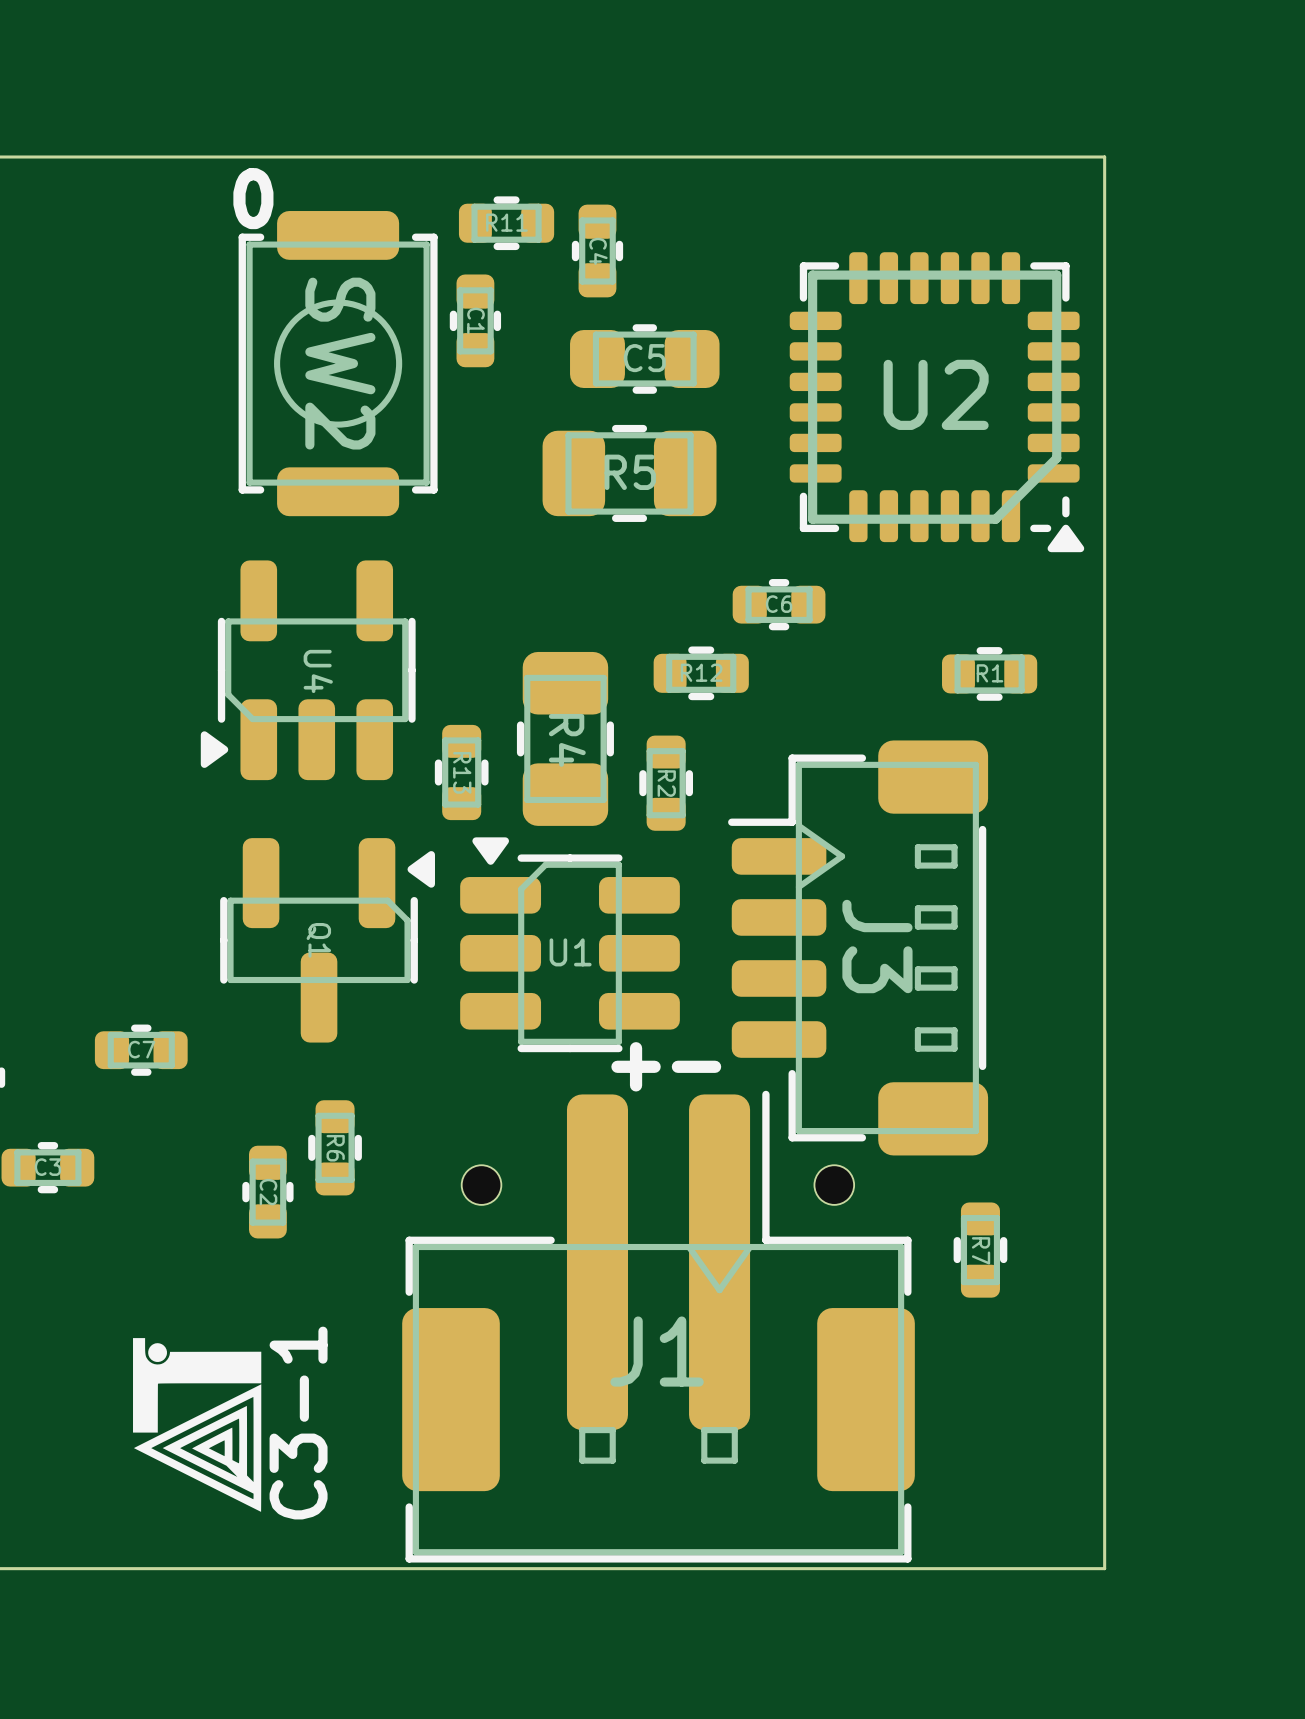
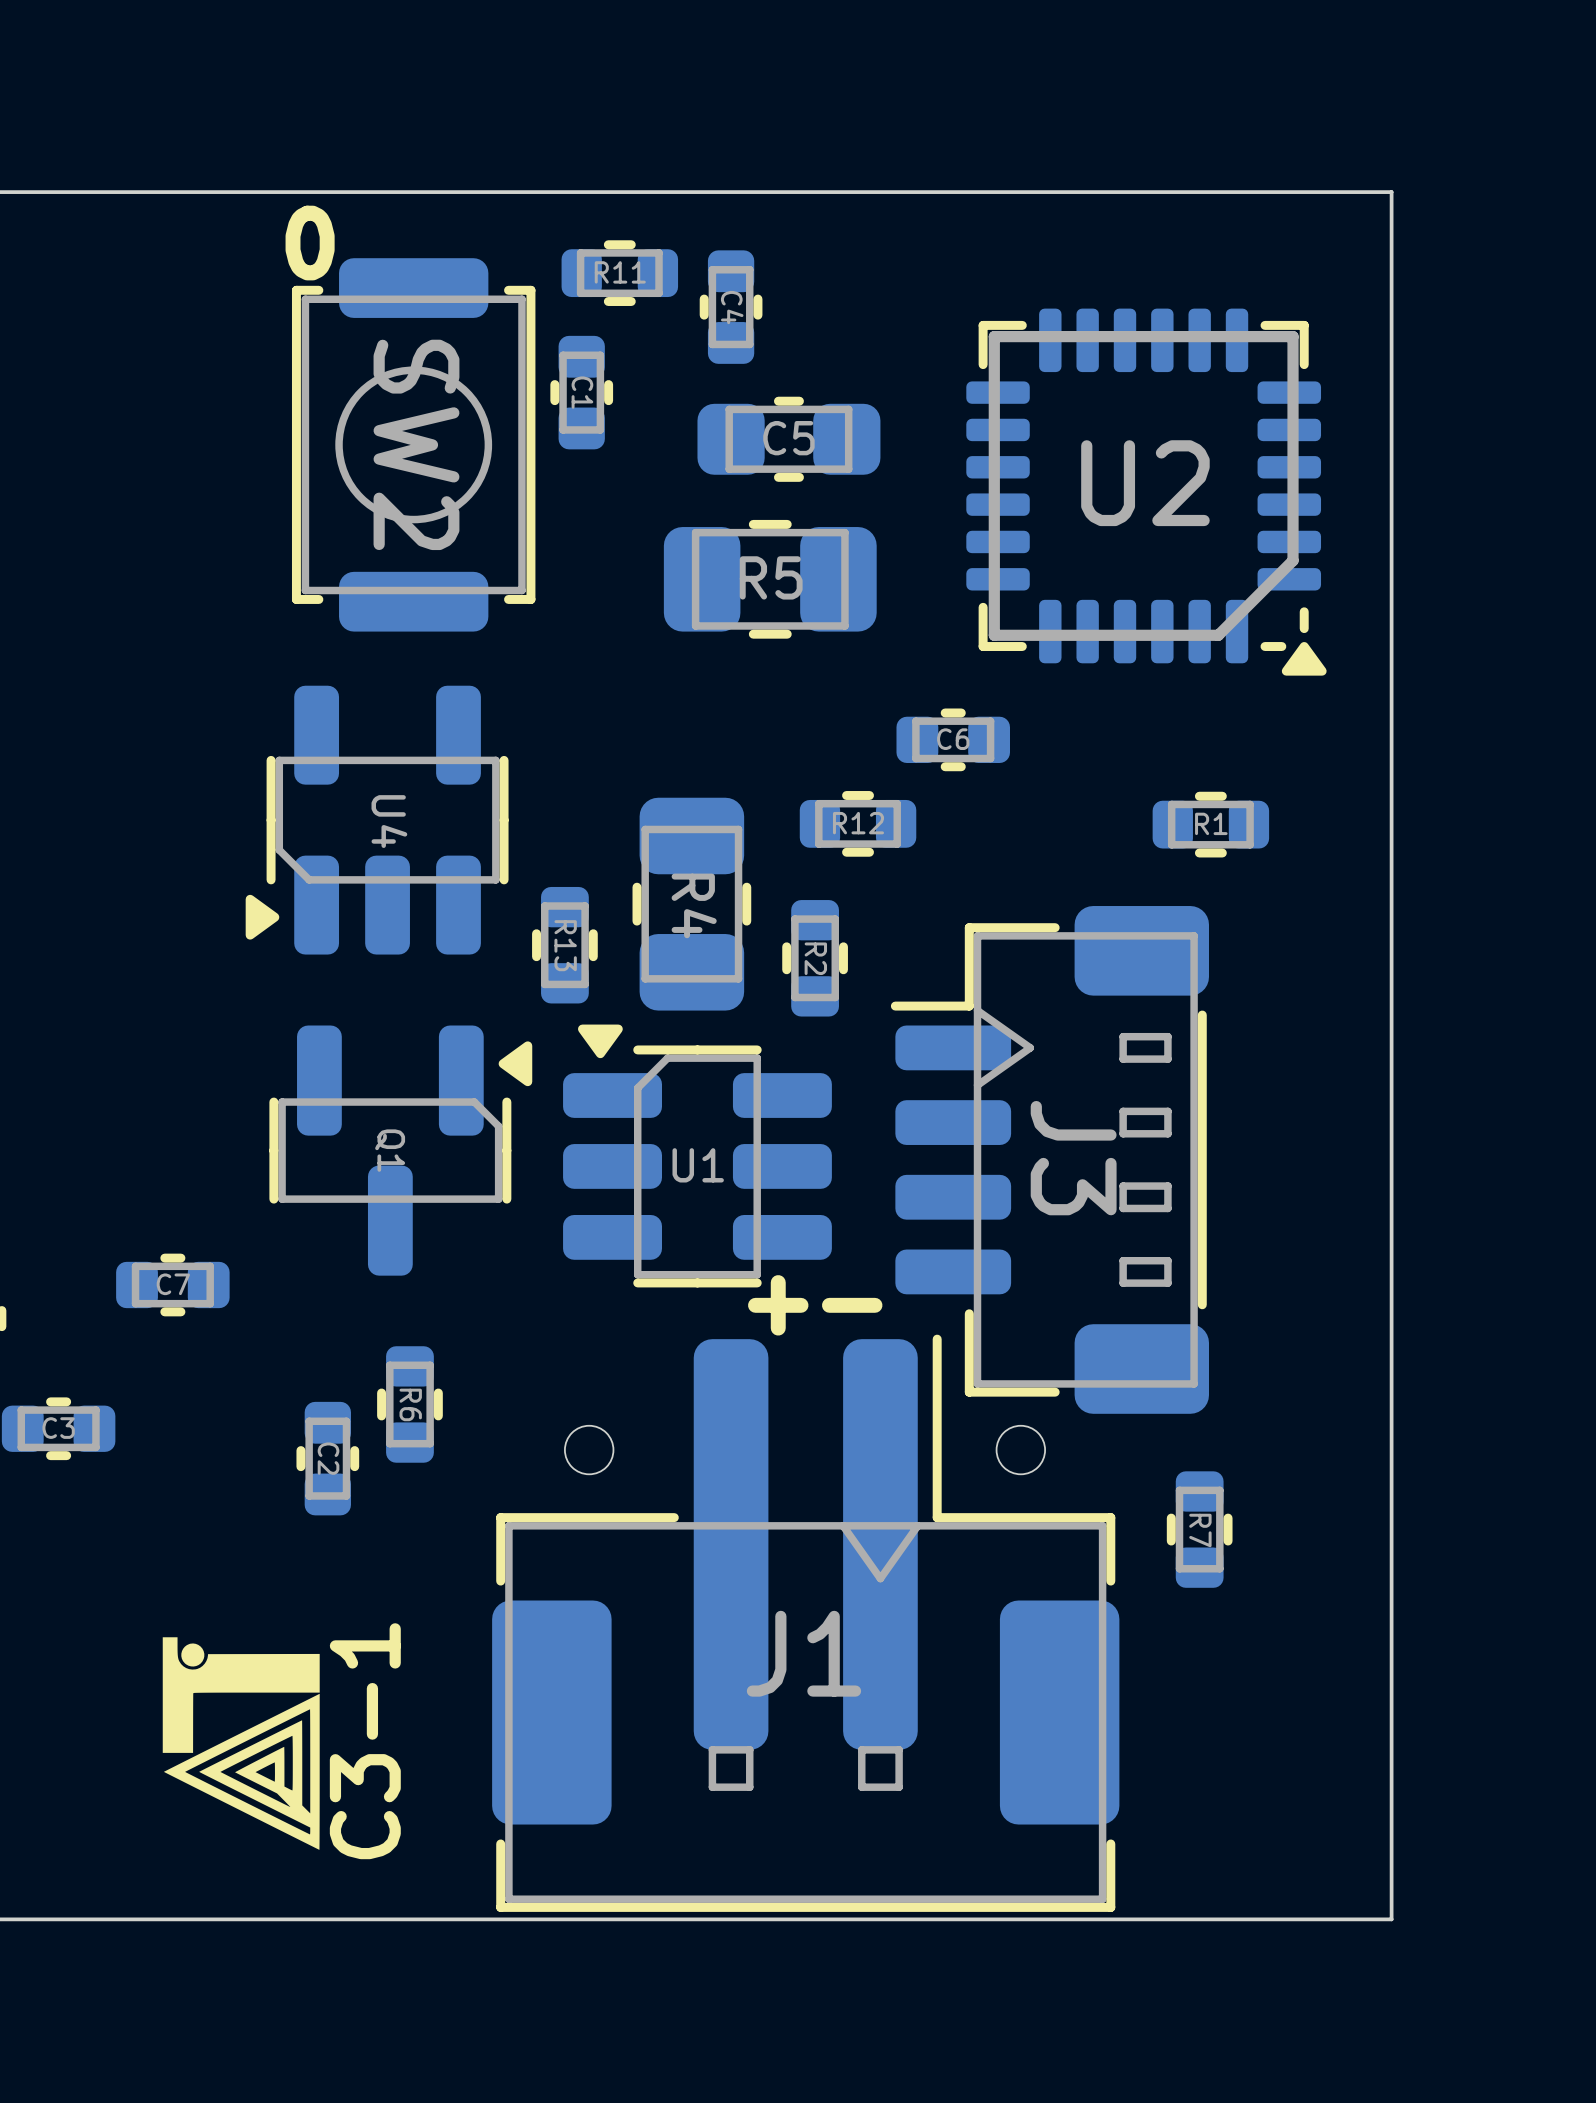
board edge: (1104, 157) (1104, 1568) -> (1351, 192) (1391, 192) (1391, 1919) (1351, 1919)

